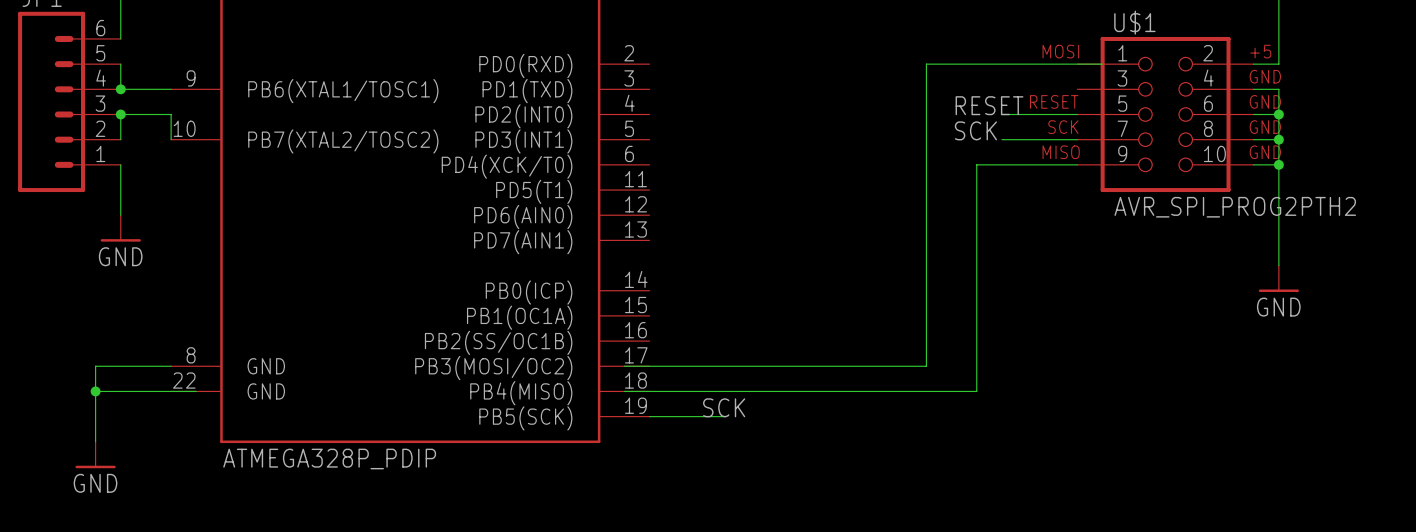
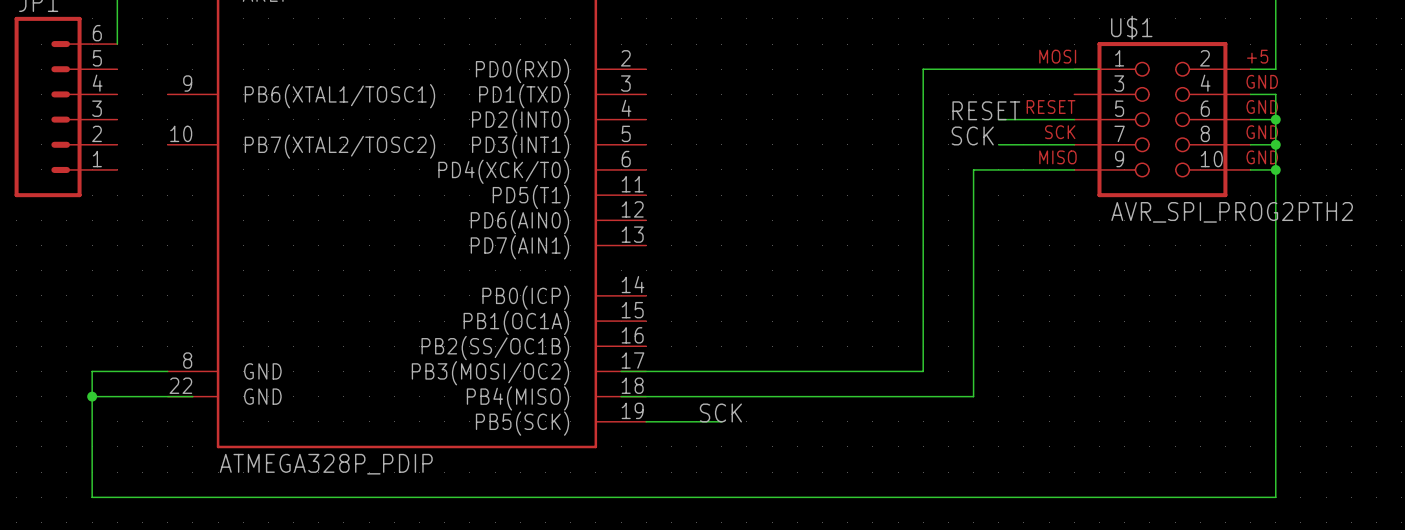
wire: (120, 64) (120, 89) (171, 89) -> none
junction: (120, 89) -> none
junction: (120, 114) -> none
wire: (120, 139) (120, 114) (171, 114) (171, 139) -> none
wire: (120, 164) (120, 215) -> none
power symbol: GND (120, 228) -> none
wire: none -> (1275, 270) (1275, 497) (92, 497) (92, 446)
power symbol: GND (1278, 278) -> none
power symbol: GND (95, 455) -> none

